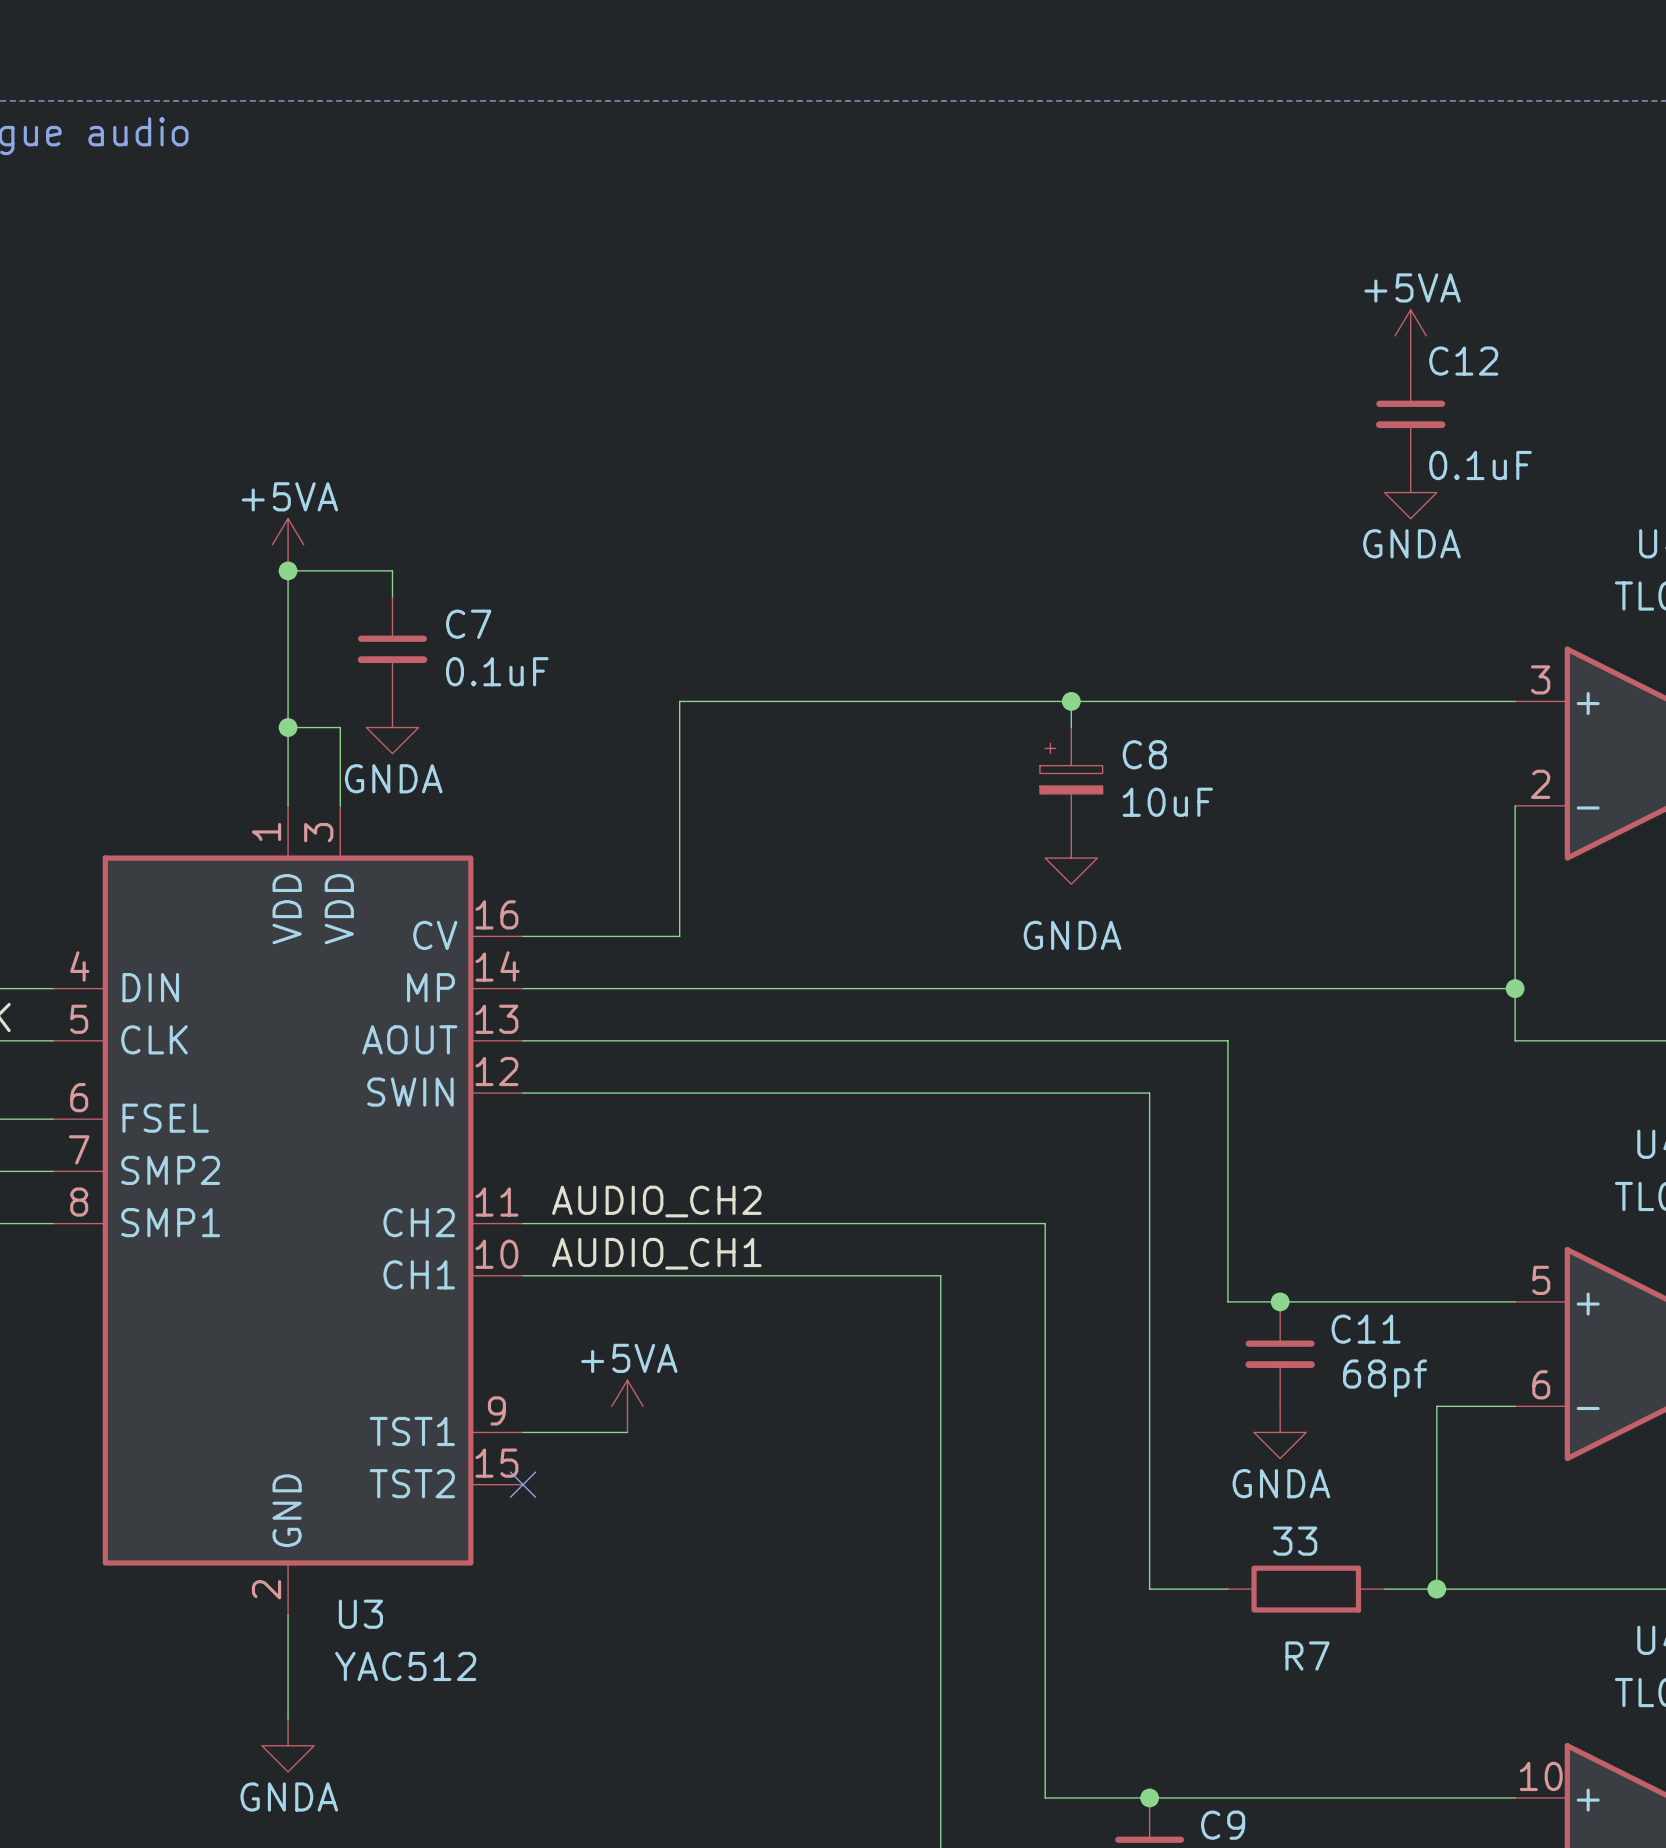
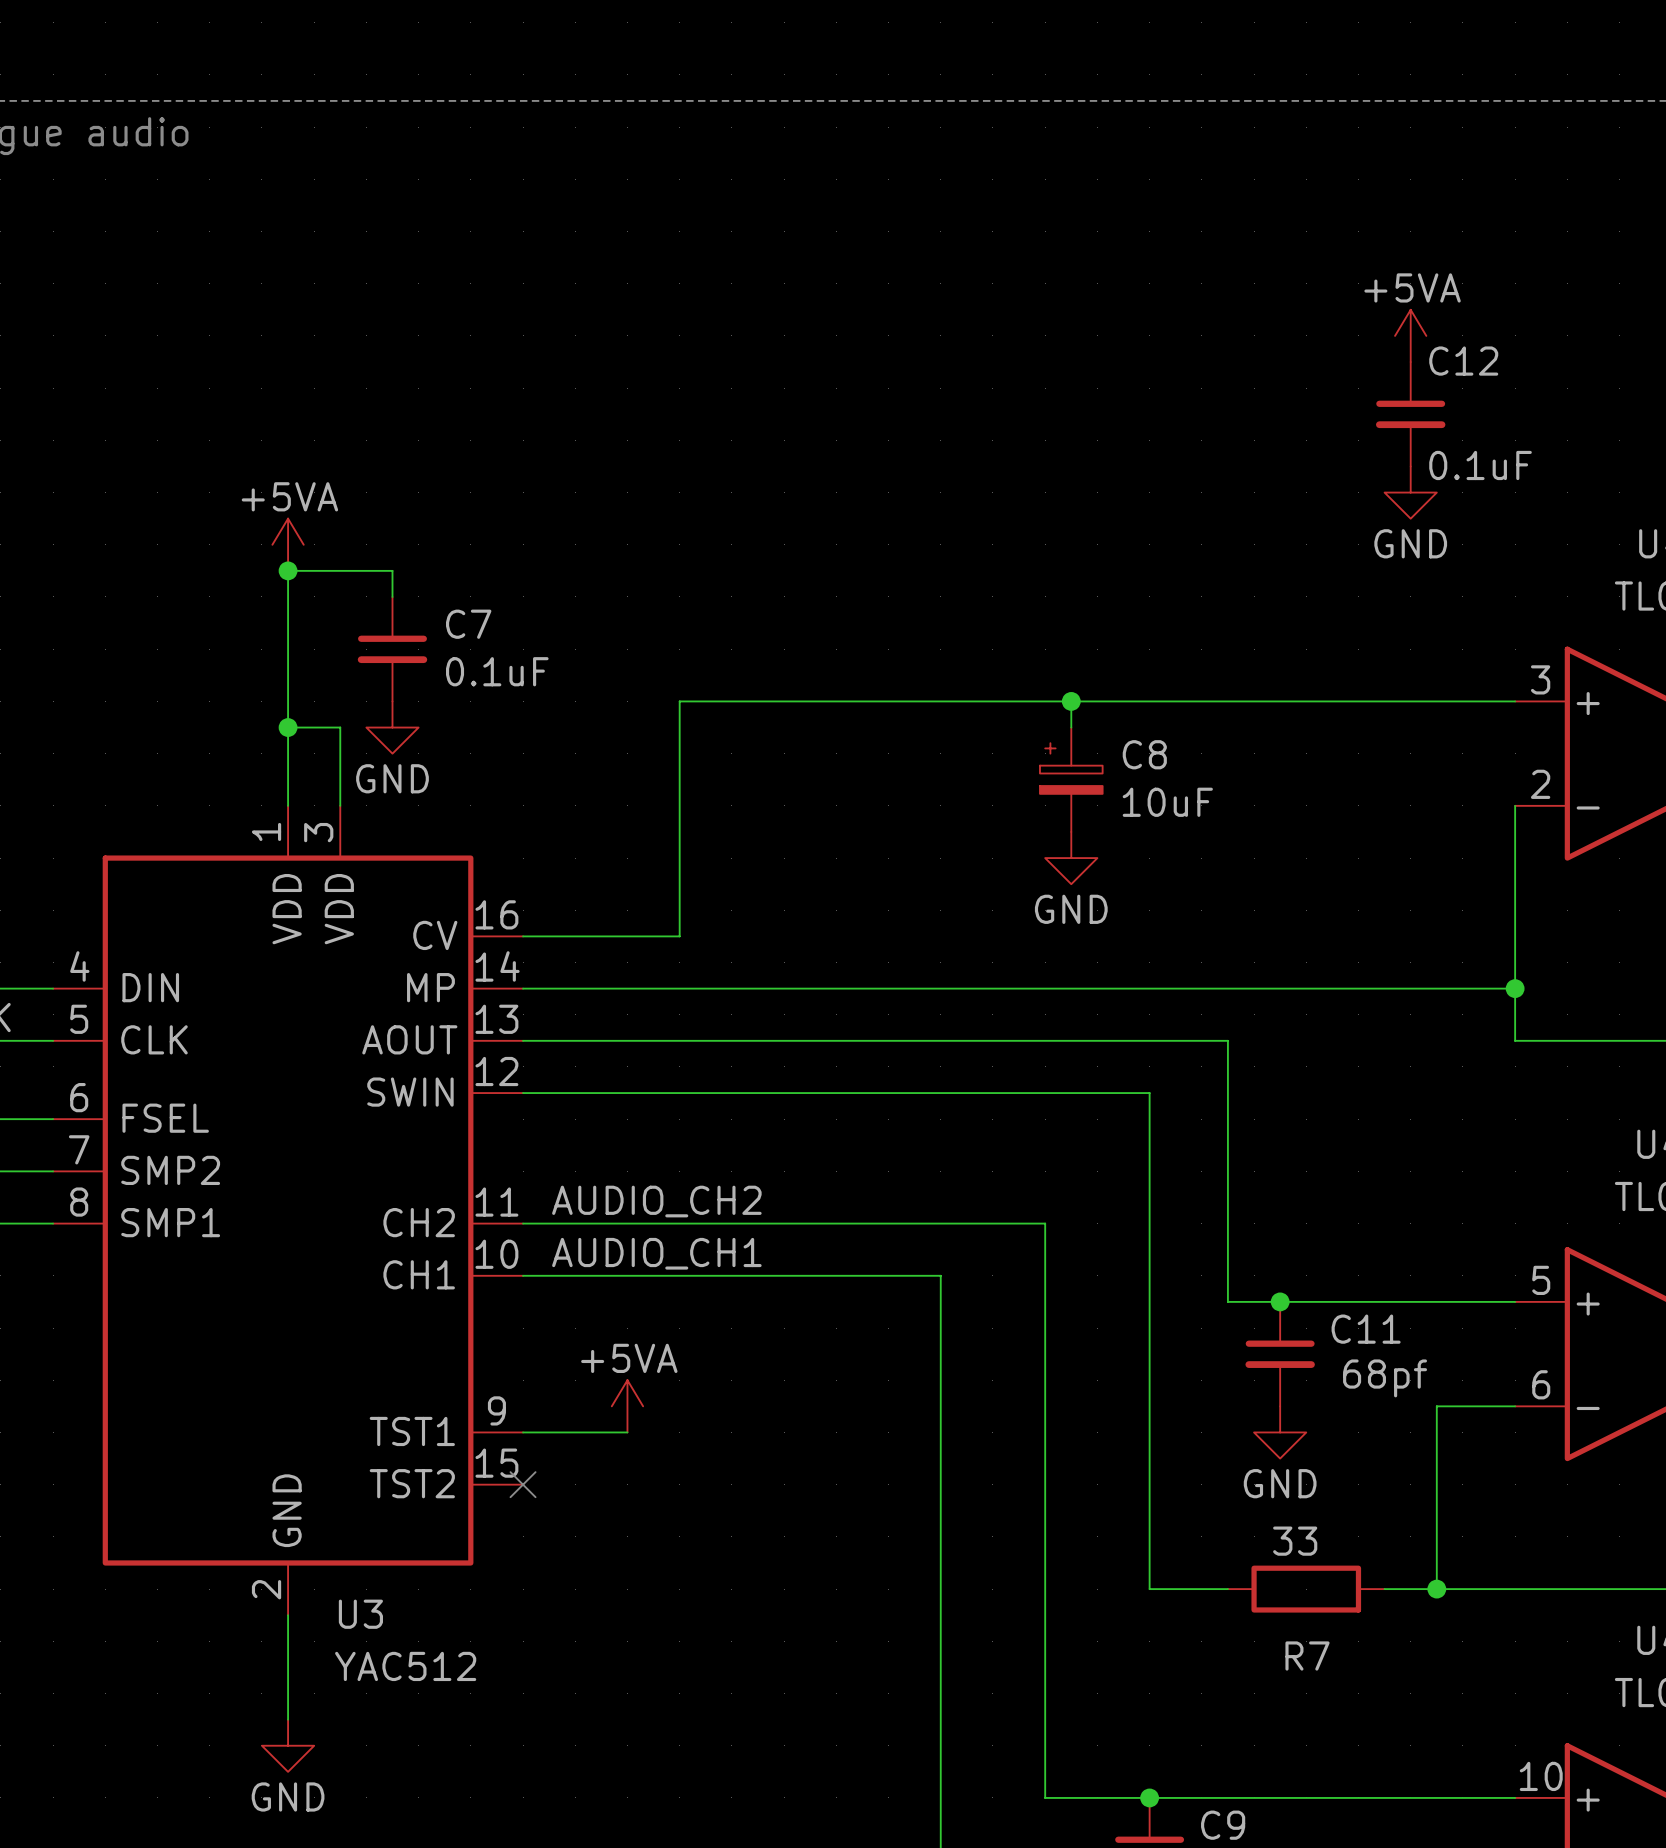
power symbol: GNDA (1410, 492) -> GND (1410, 492)
power symbol: GNDA (392, 727) -> GND (392, 727)
power symbol: GNDA (1071, 858) -> GND (1071, 858)
power symbol: GNDA (1280, 1432) -> GND (1280, 1432)
power symbol: GNDA (288, 1745) -> GND (288, 1745)

